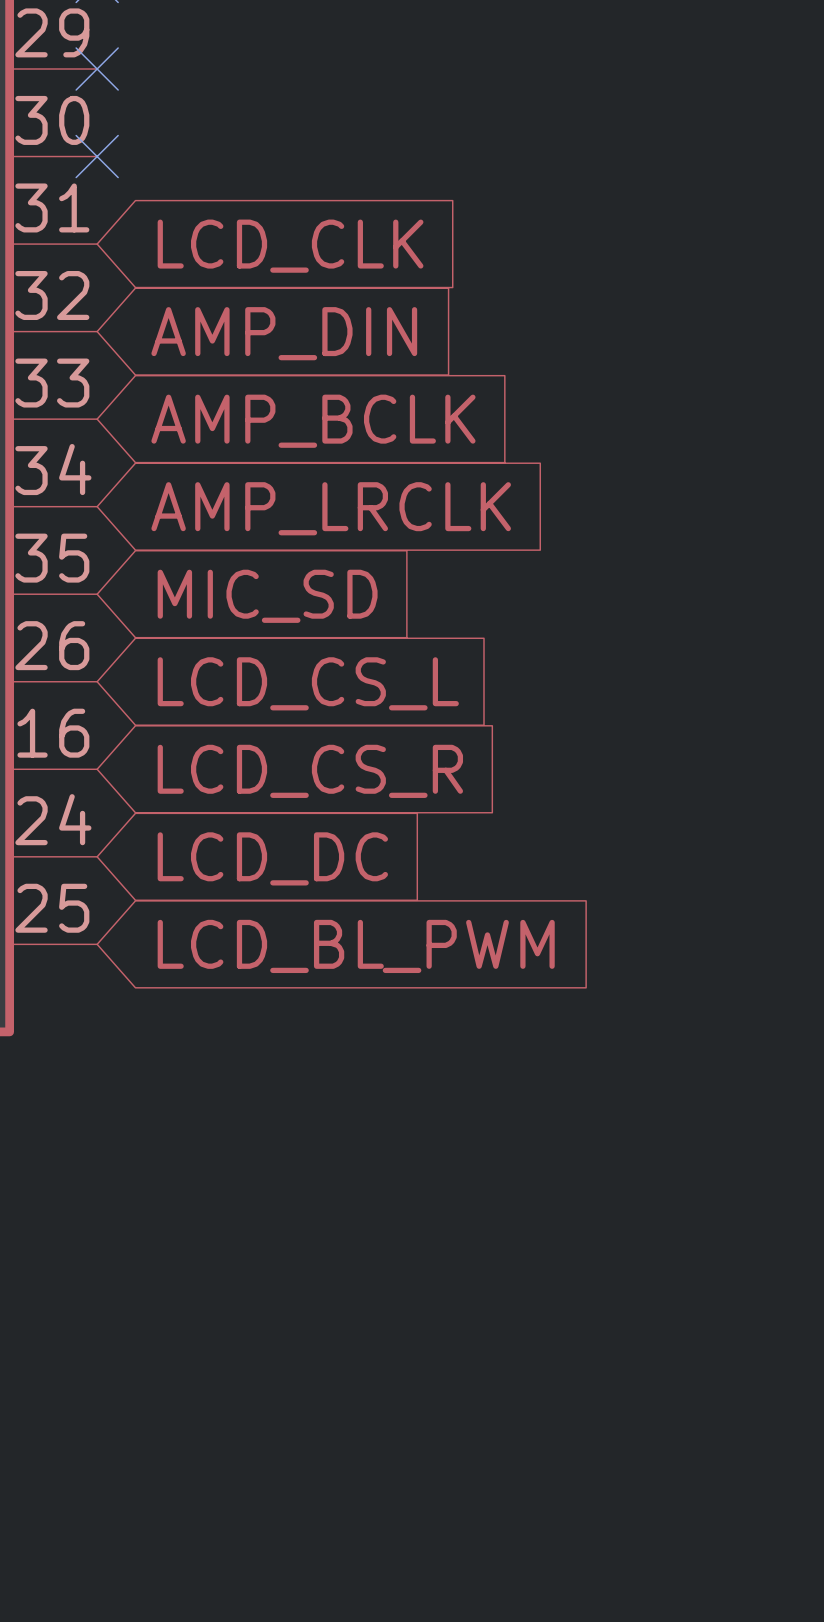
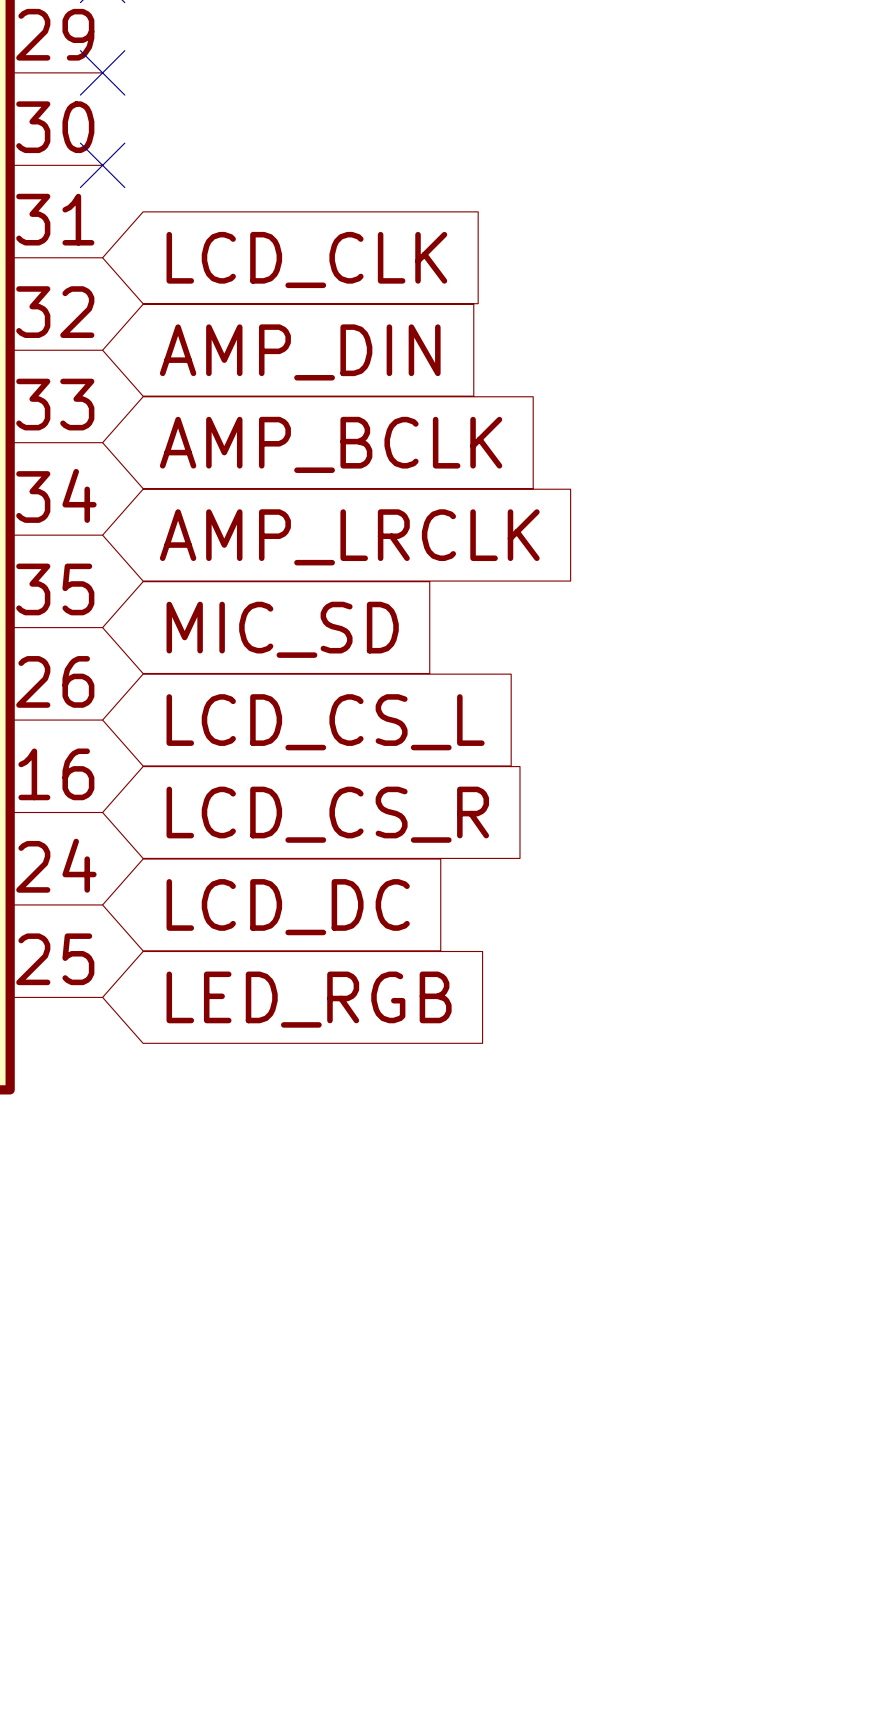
global label: LCD_BL_PWM (356, 946) -> LED_RGB (309, 999)

